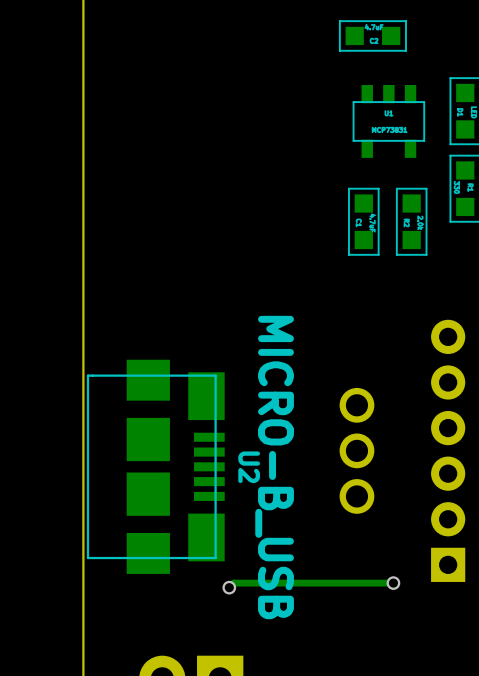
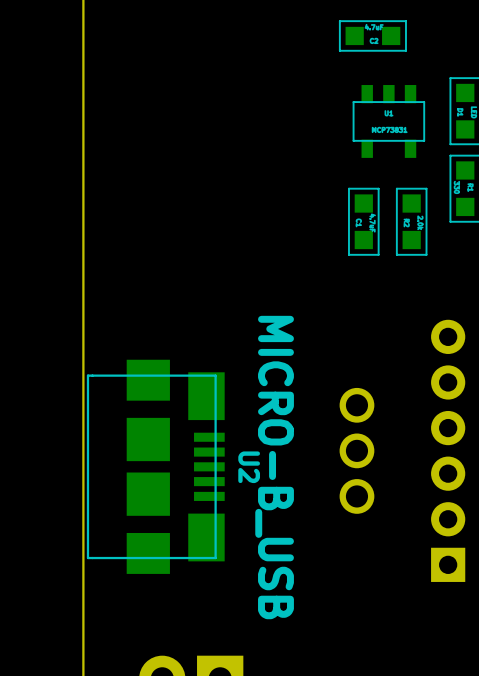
track: (393, 583) (233, 583) (229, 587) -> none
via: (393, 583) -> none
via: (229, 587) -> none

